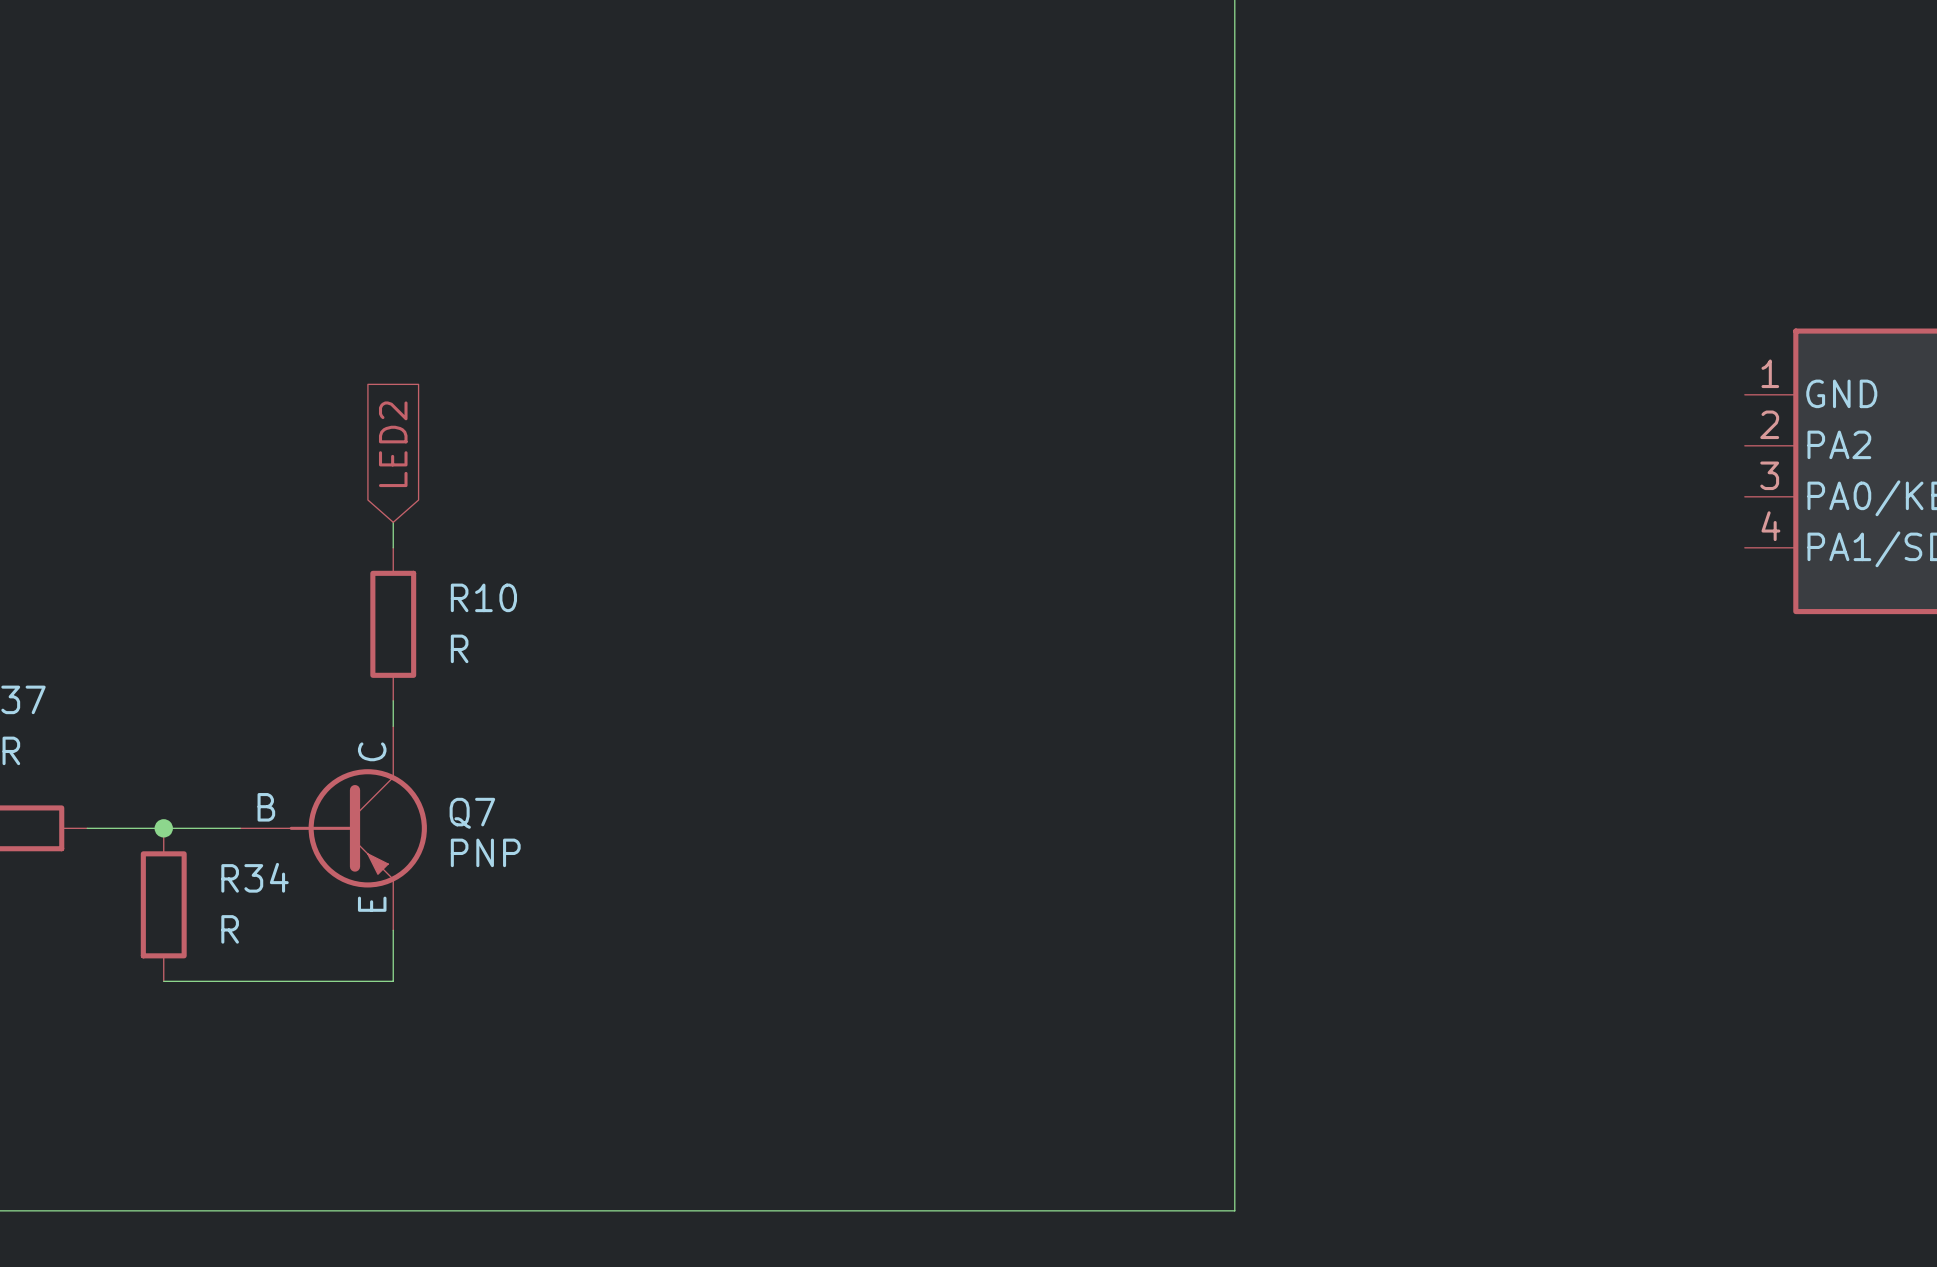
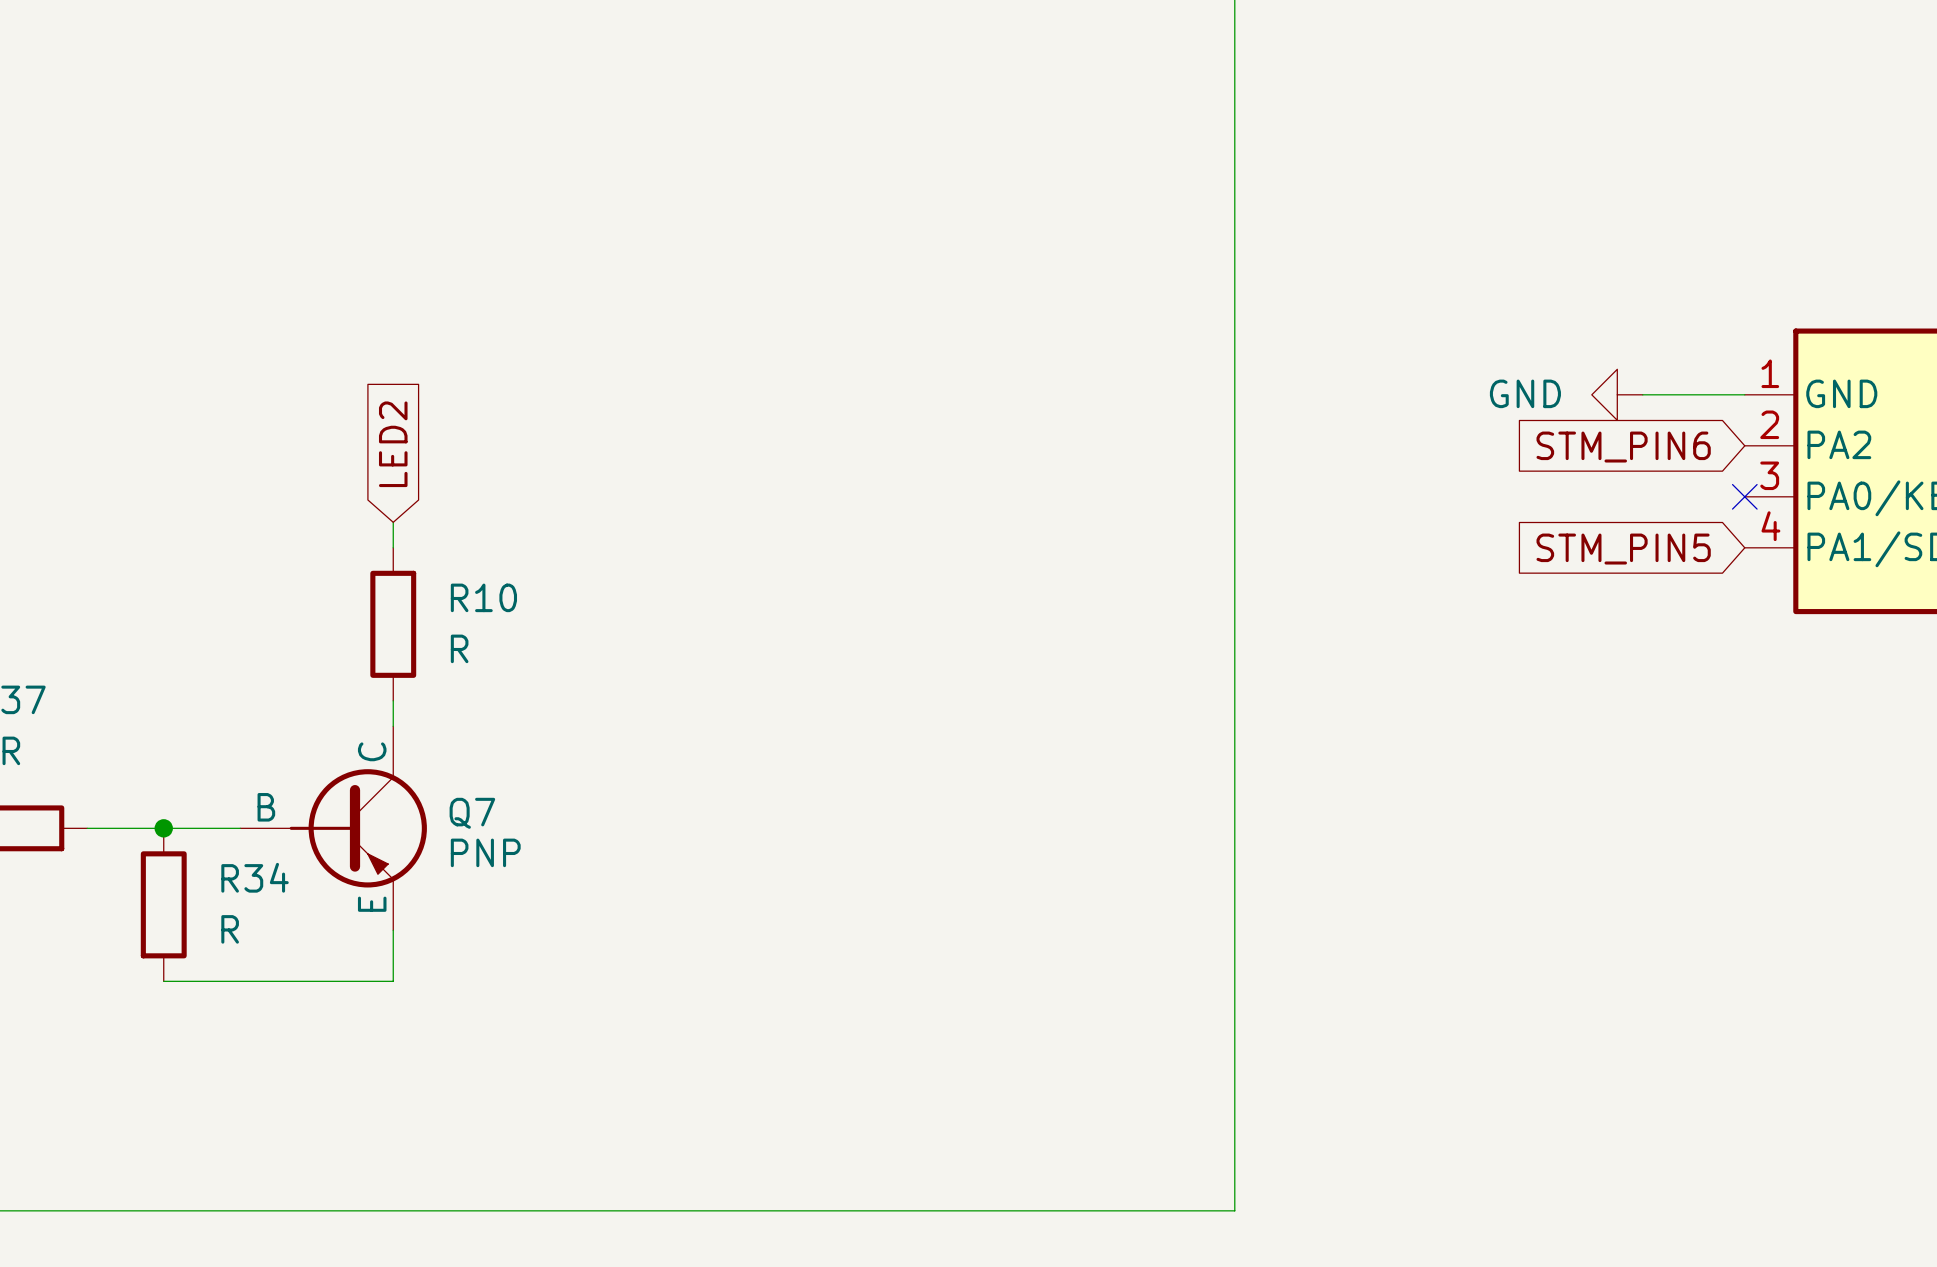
power symbol: none -> GND (1617, 394)
wire: none -> (1642, 394) (1744, 394)
global label: none -> STM_PIN6 (1623, 447)
no-connect mark: none -> (1744, 496)
global label: none -> STM_PIN5 (1623, 549)

